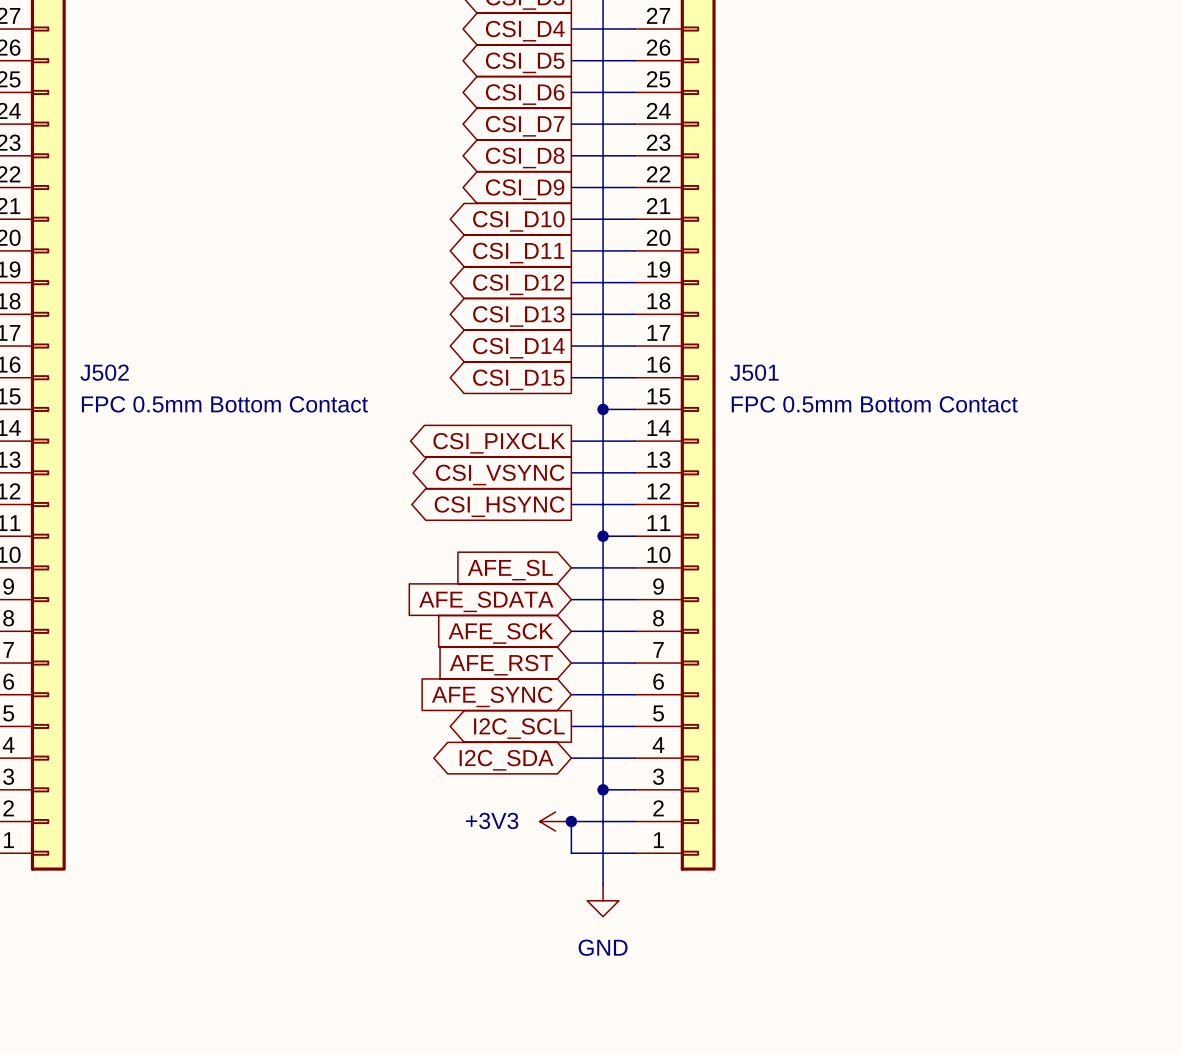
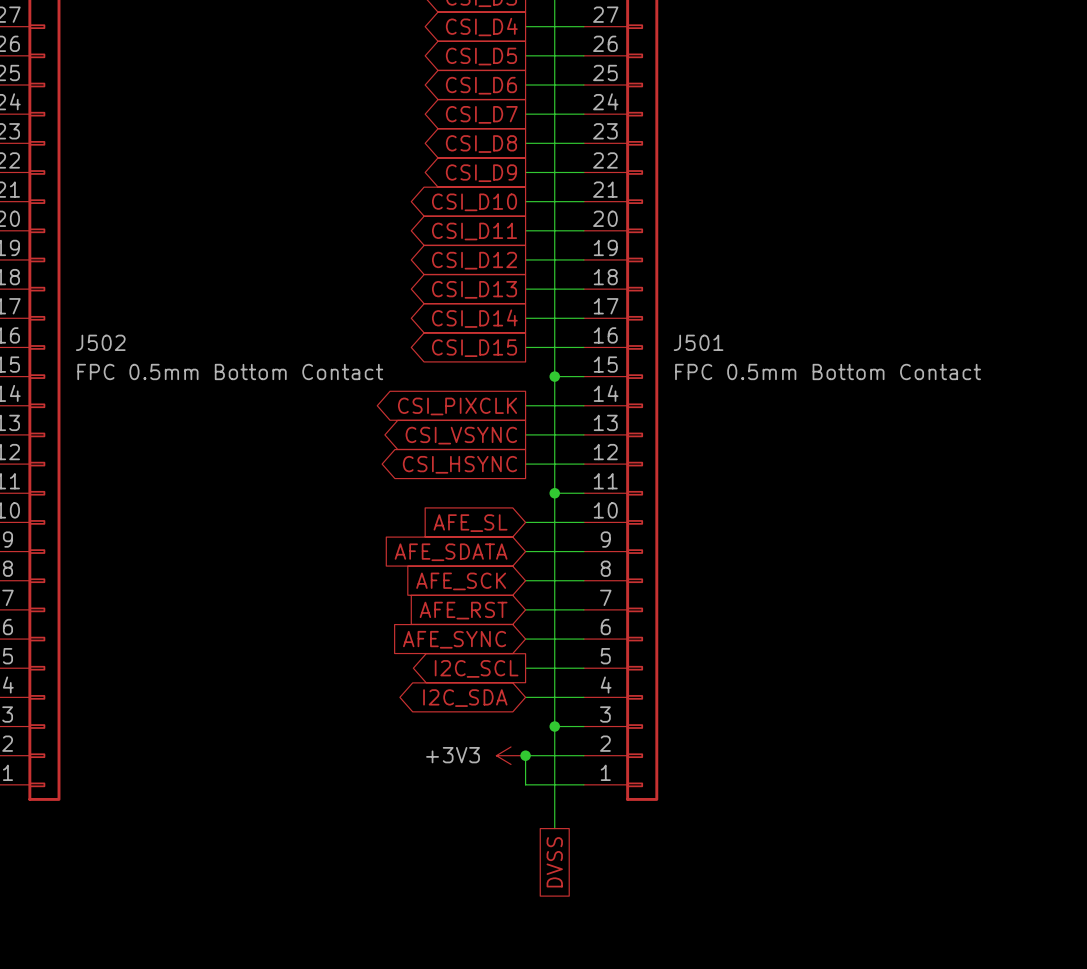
power symbol: GND (603, 900) -> none
global label: none -> DVSS (554, 862)

